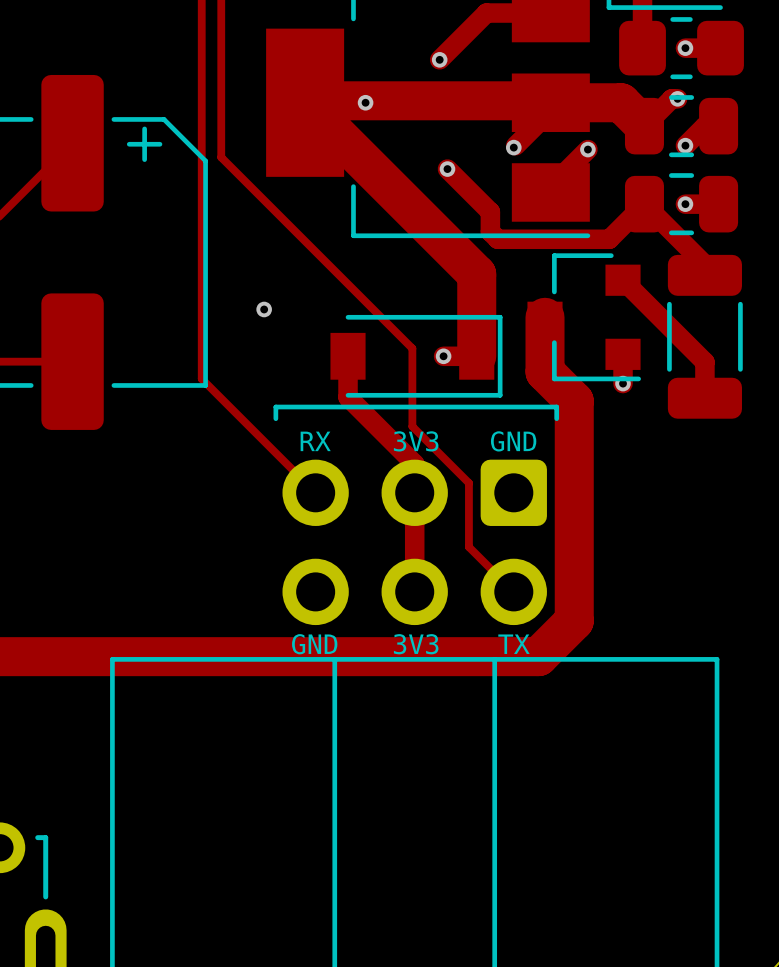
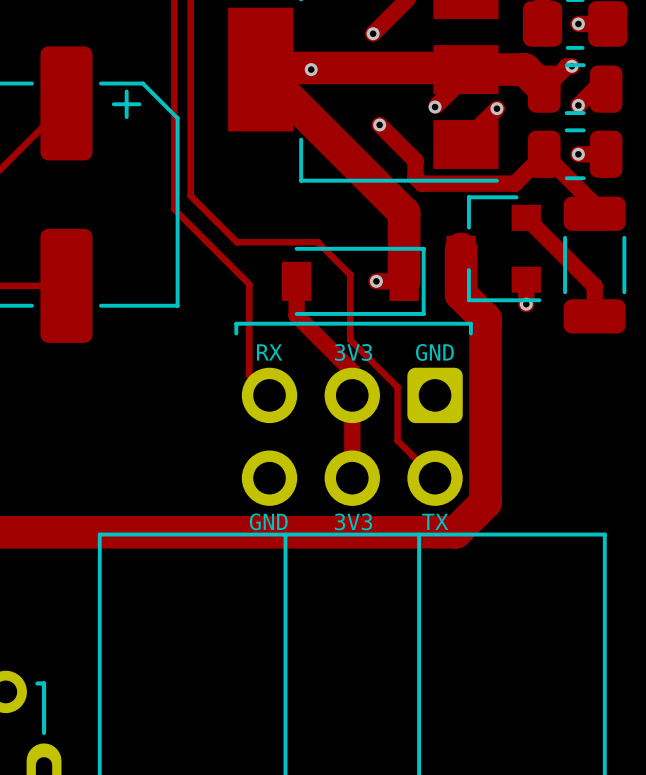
track: (221, 157) (373, 309) -> (190, 115) (190, 195) (237, 242) (317, 242)
track: (201, 270) (201, 378) (291, 468) -> (174, 209) (249, 284) (249, 375)
via: (264, 309) -> none

